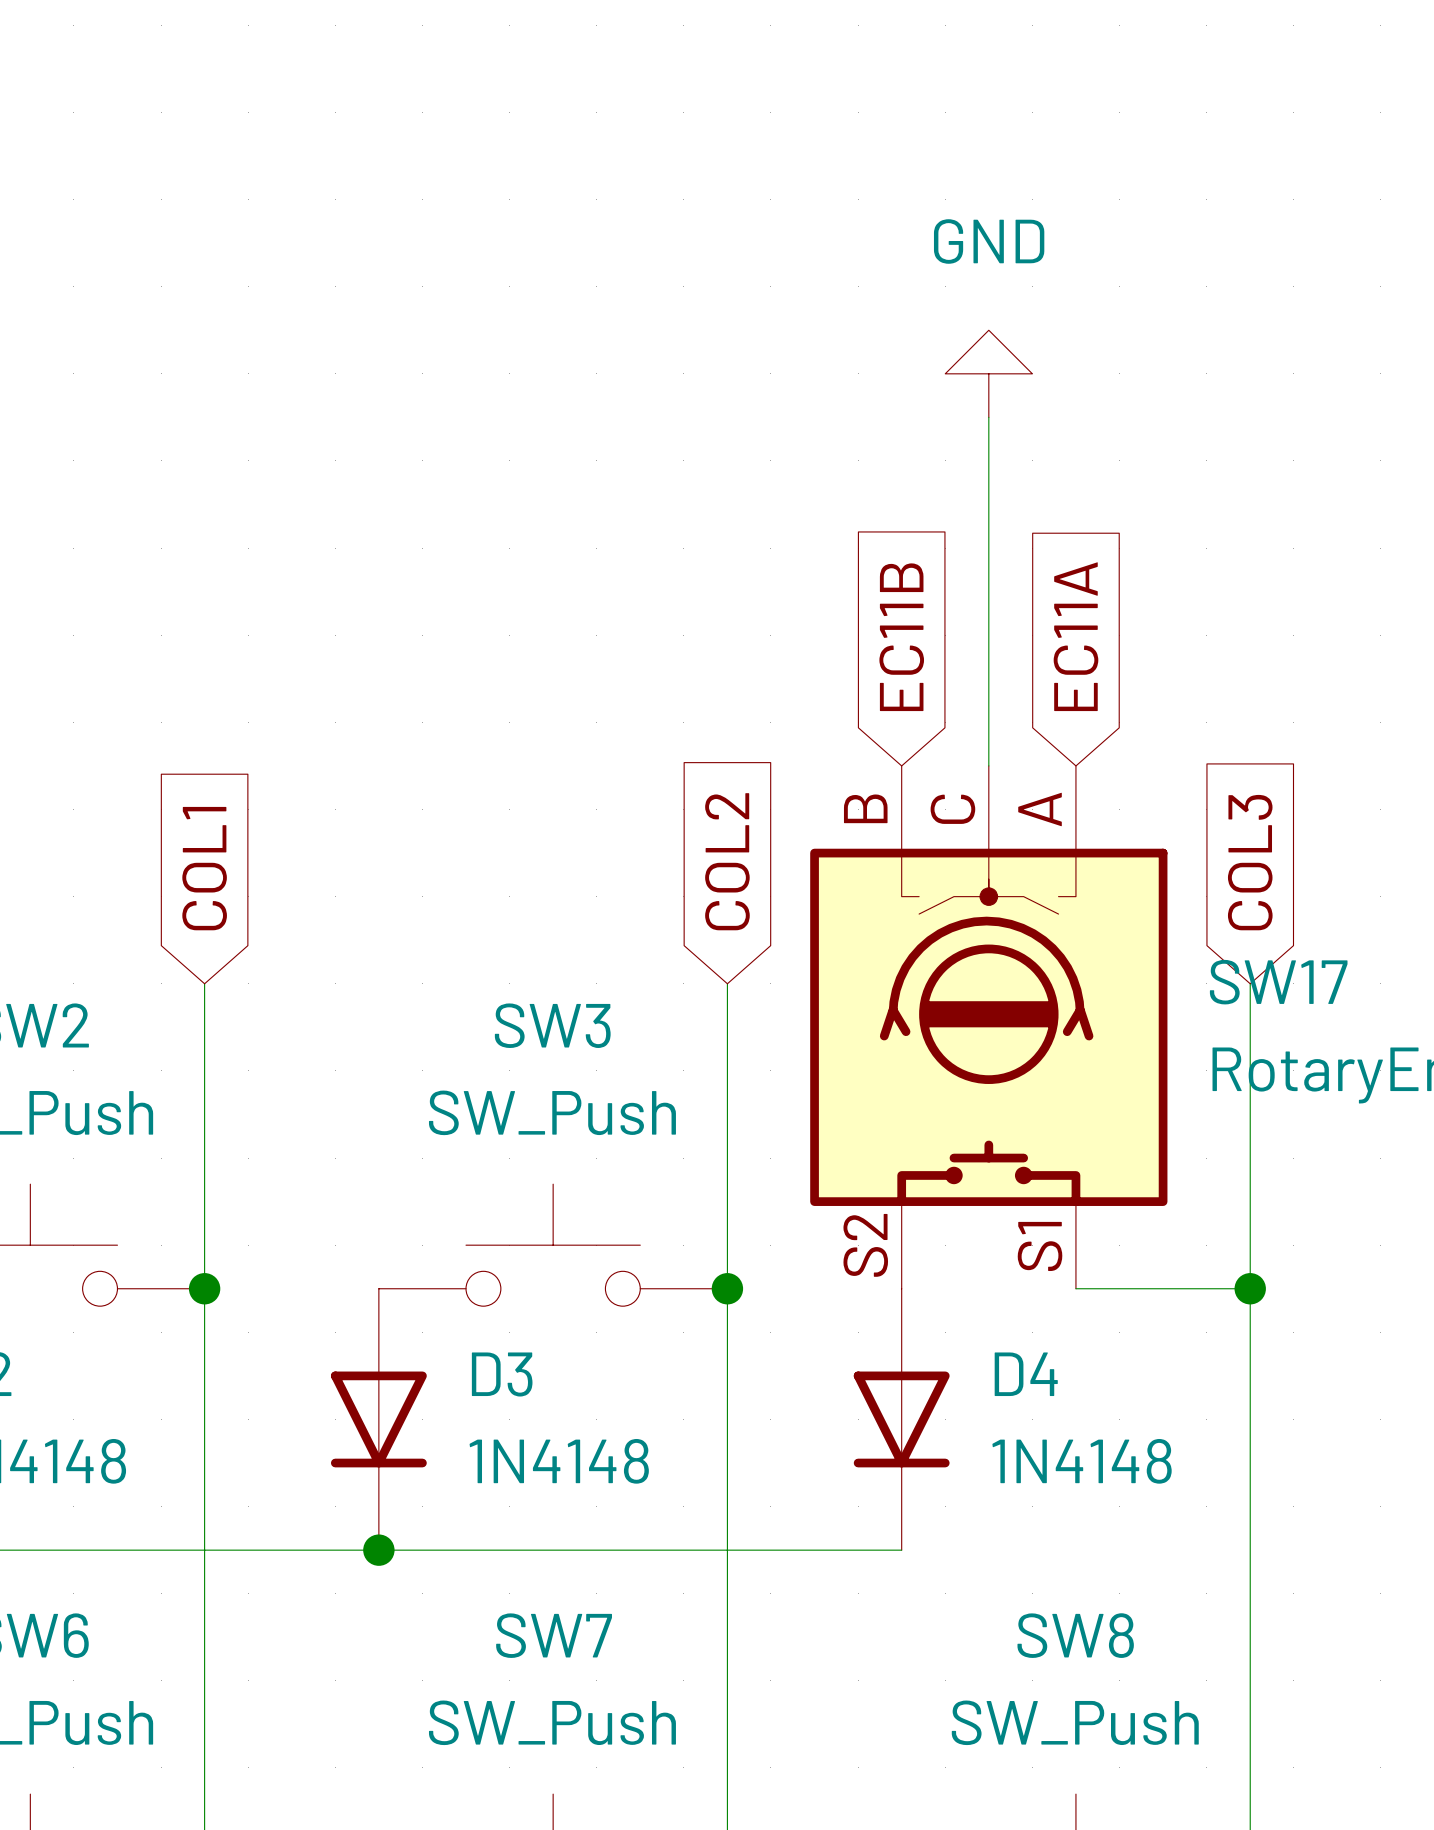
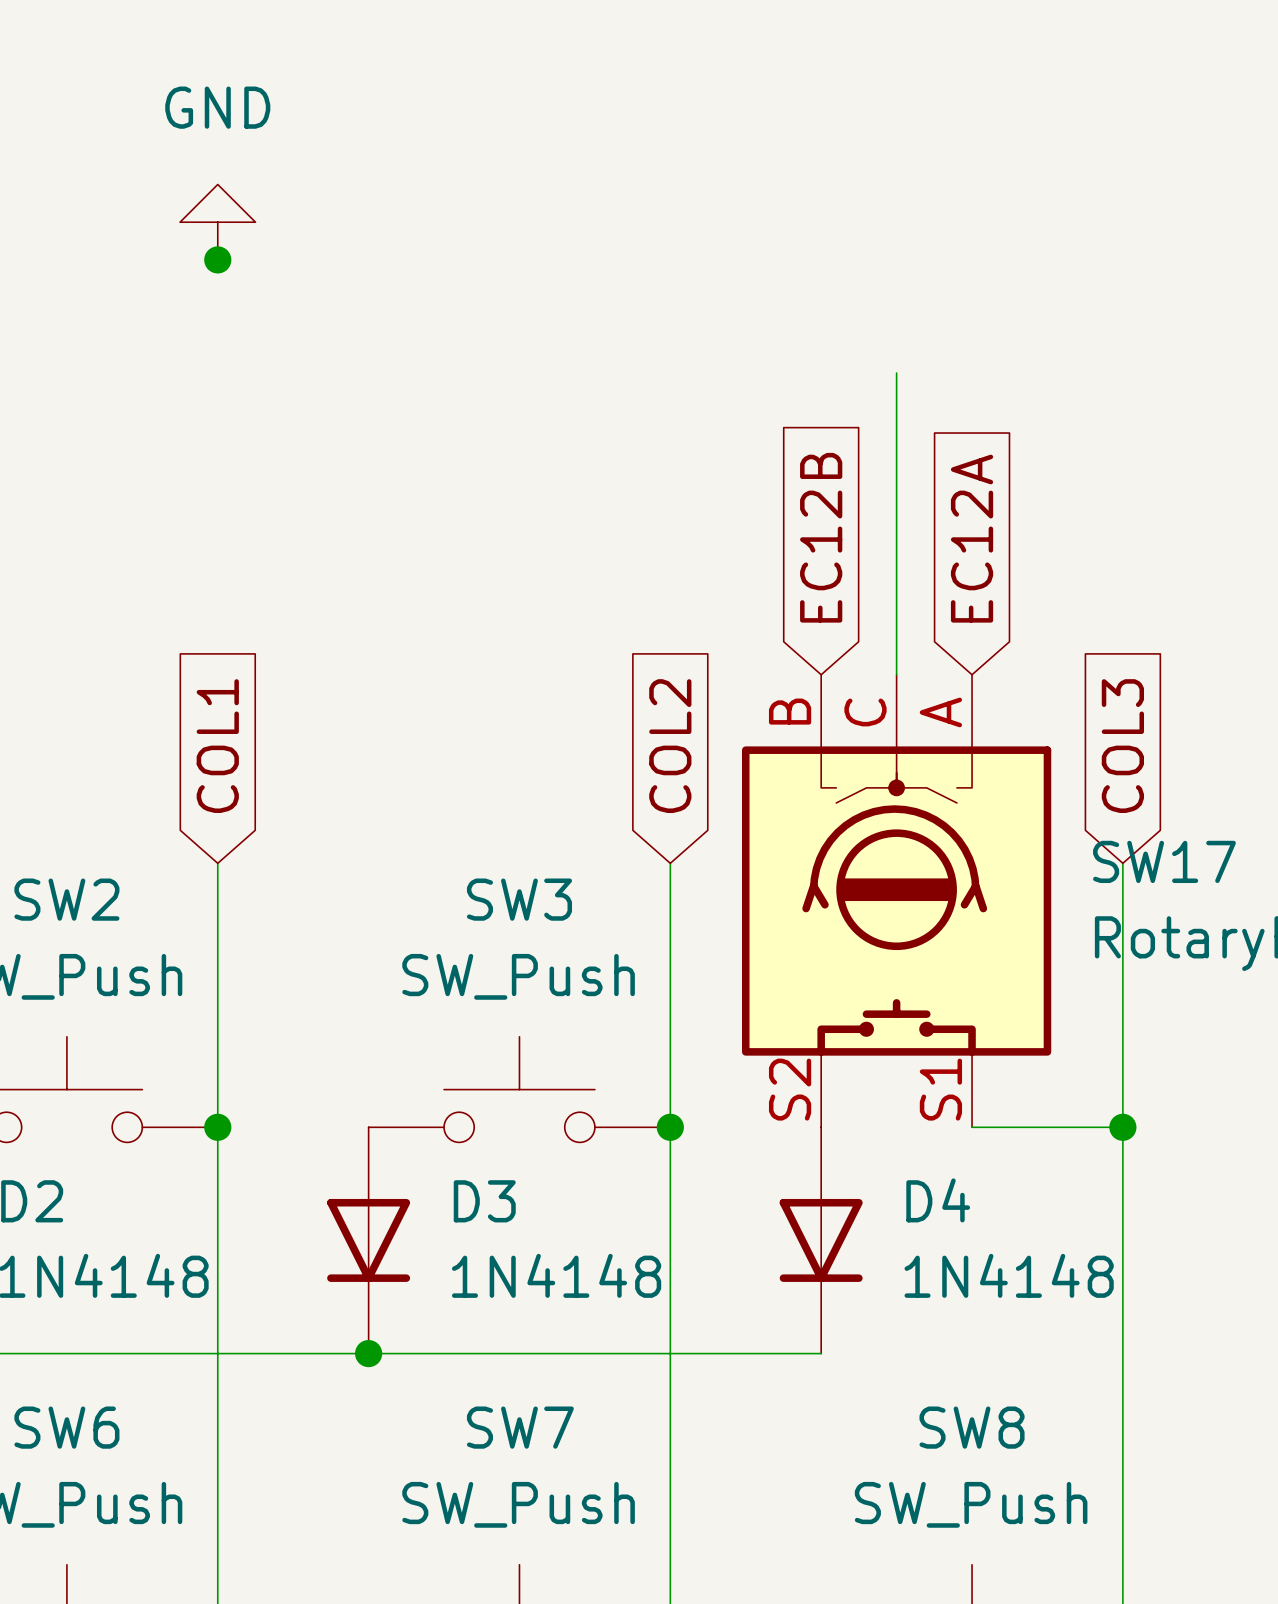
junction: none -> (217, 259)
power symbol position: GND (988, 373) -> GND (217, 222)
global label: EC11A (1075, 636) -> EC12A (972, 538)
global label: EC11B (901, 637) -> EC12B (821, 537)

